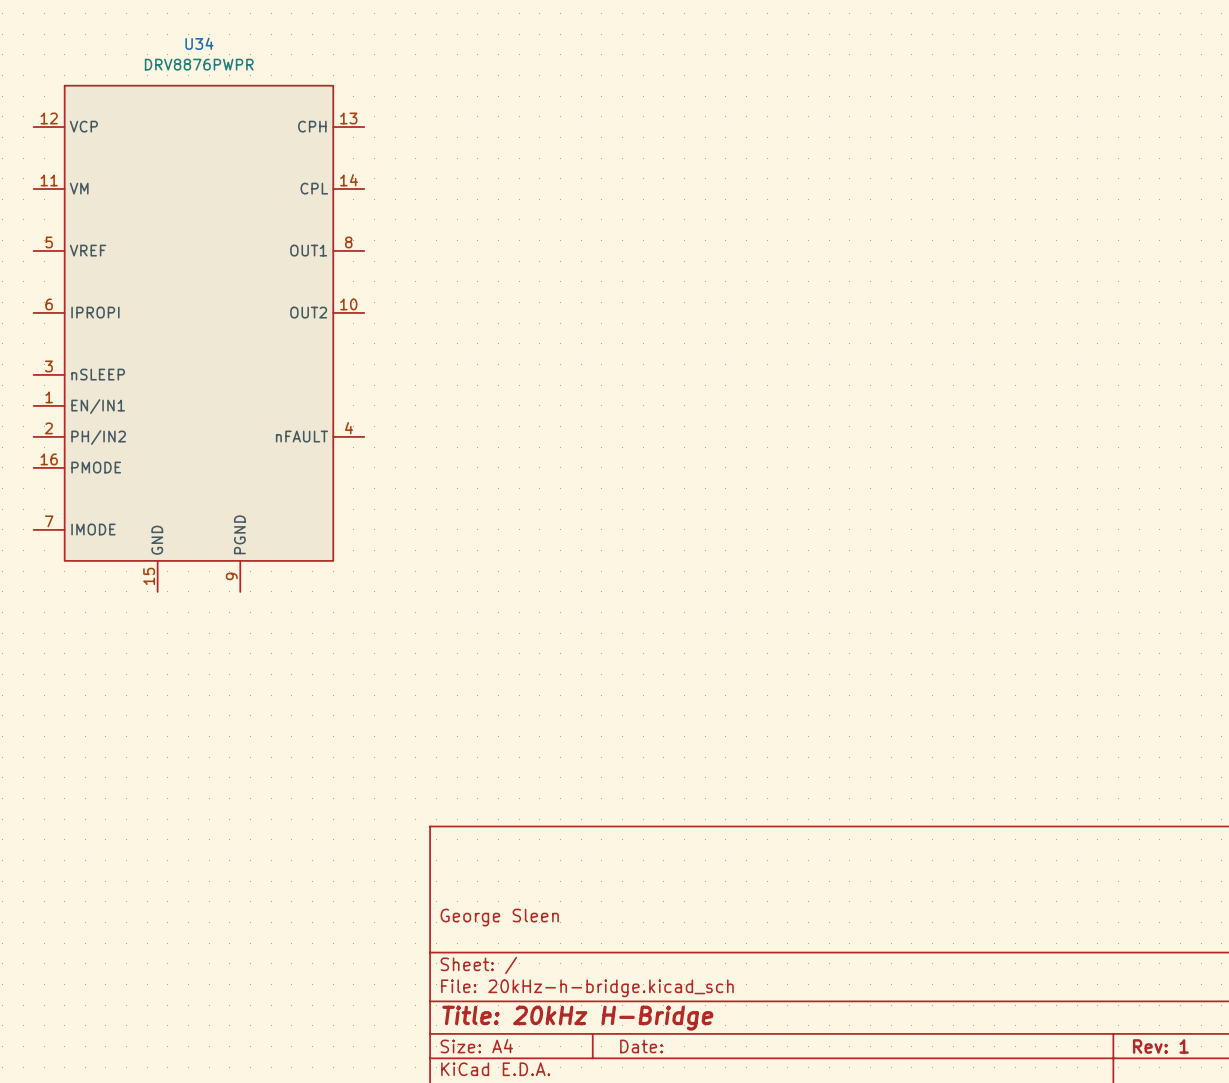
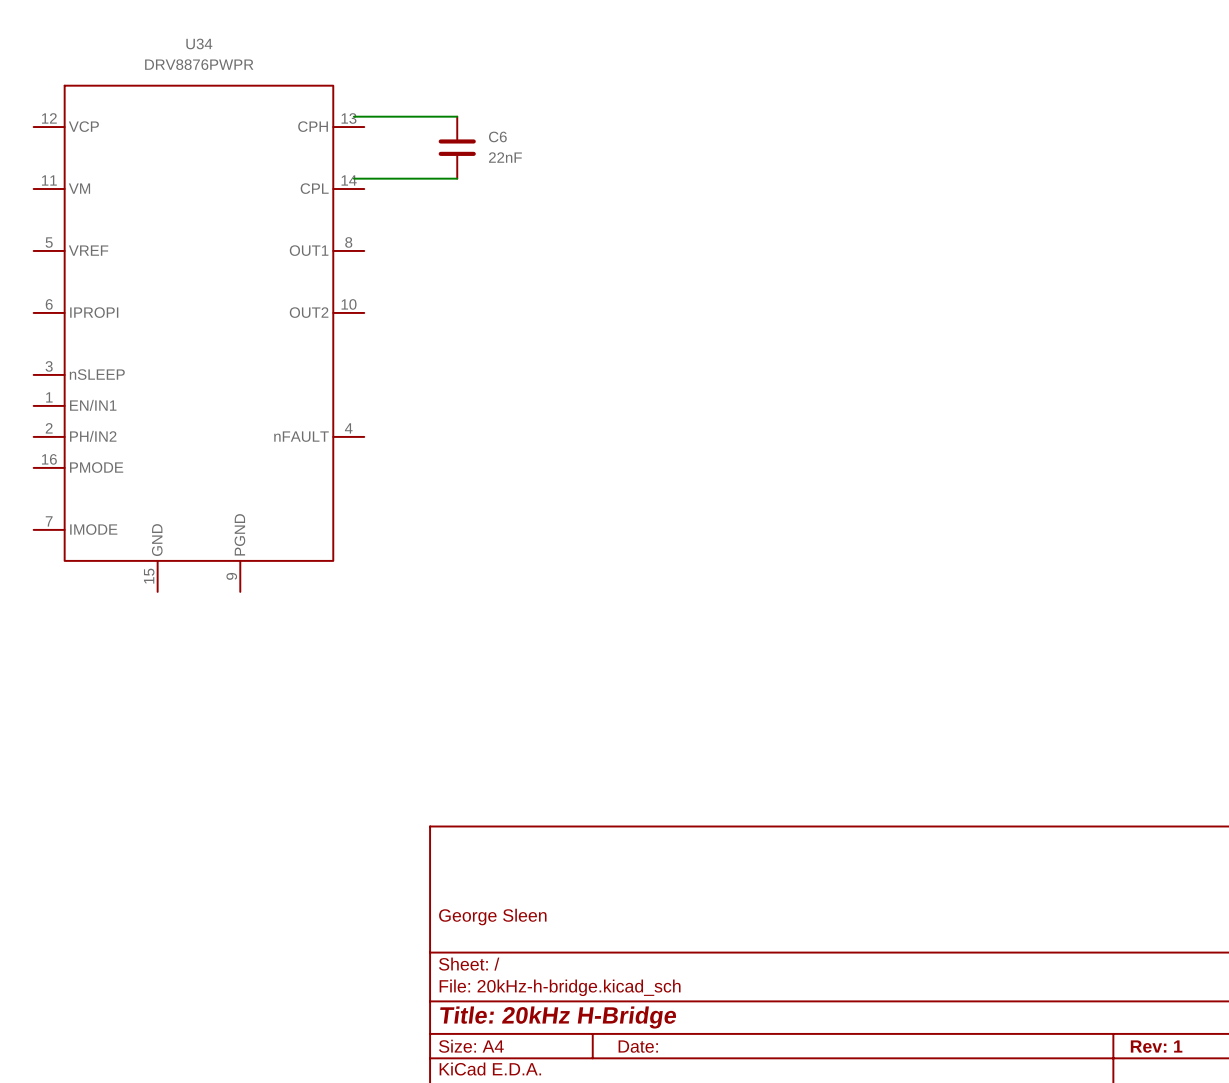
wire: none -> (353, 116) (457, 116)
C6: none -> 22nF (457, 147)
wire: none -> (353, 178) (457, 178)

